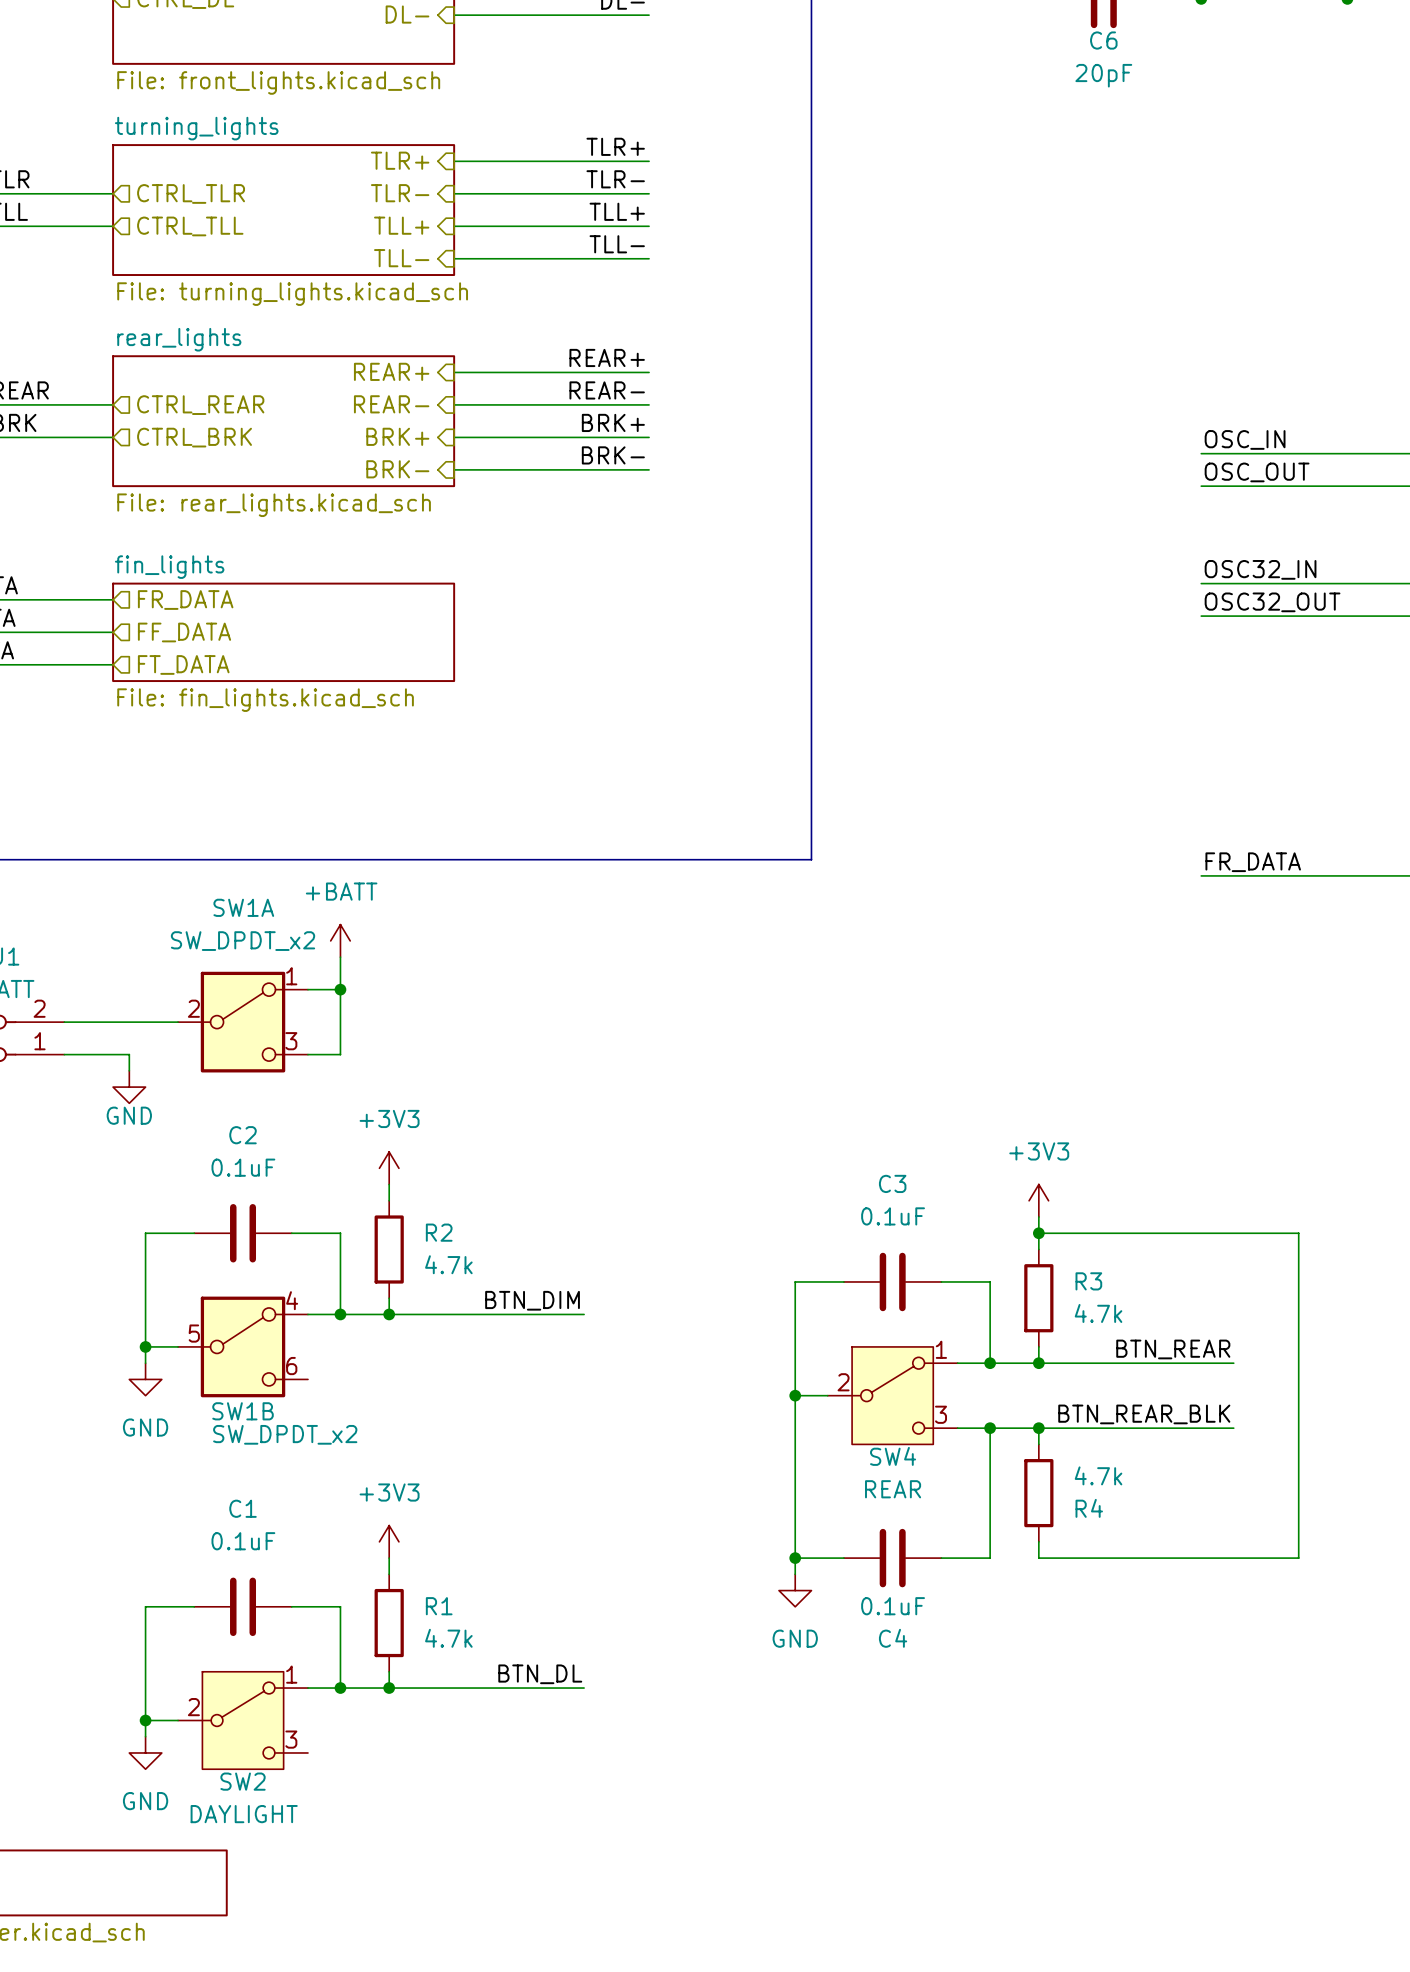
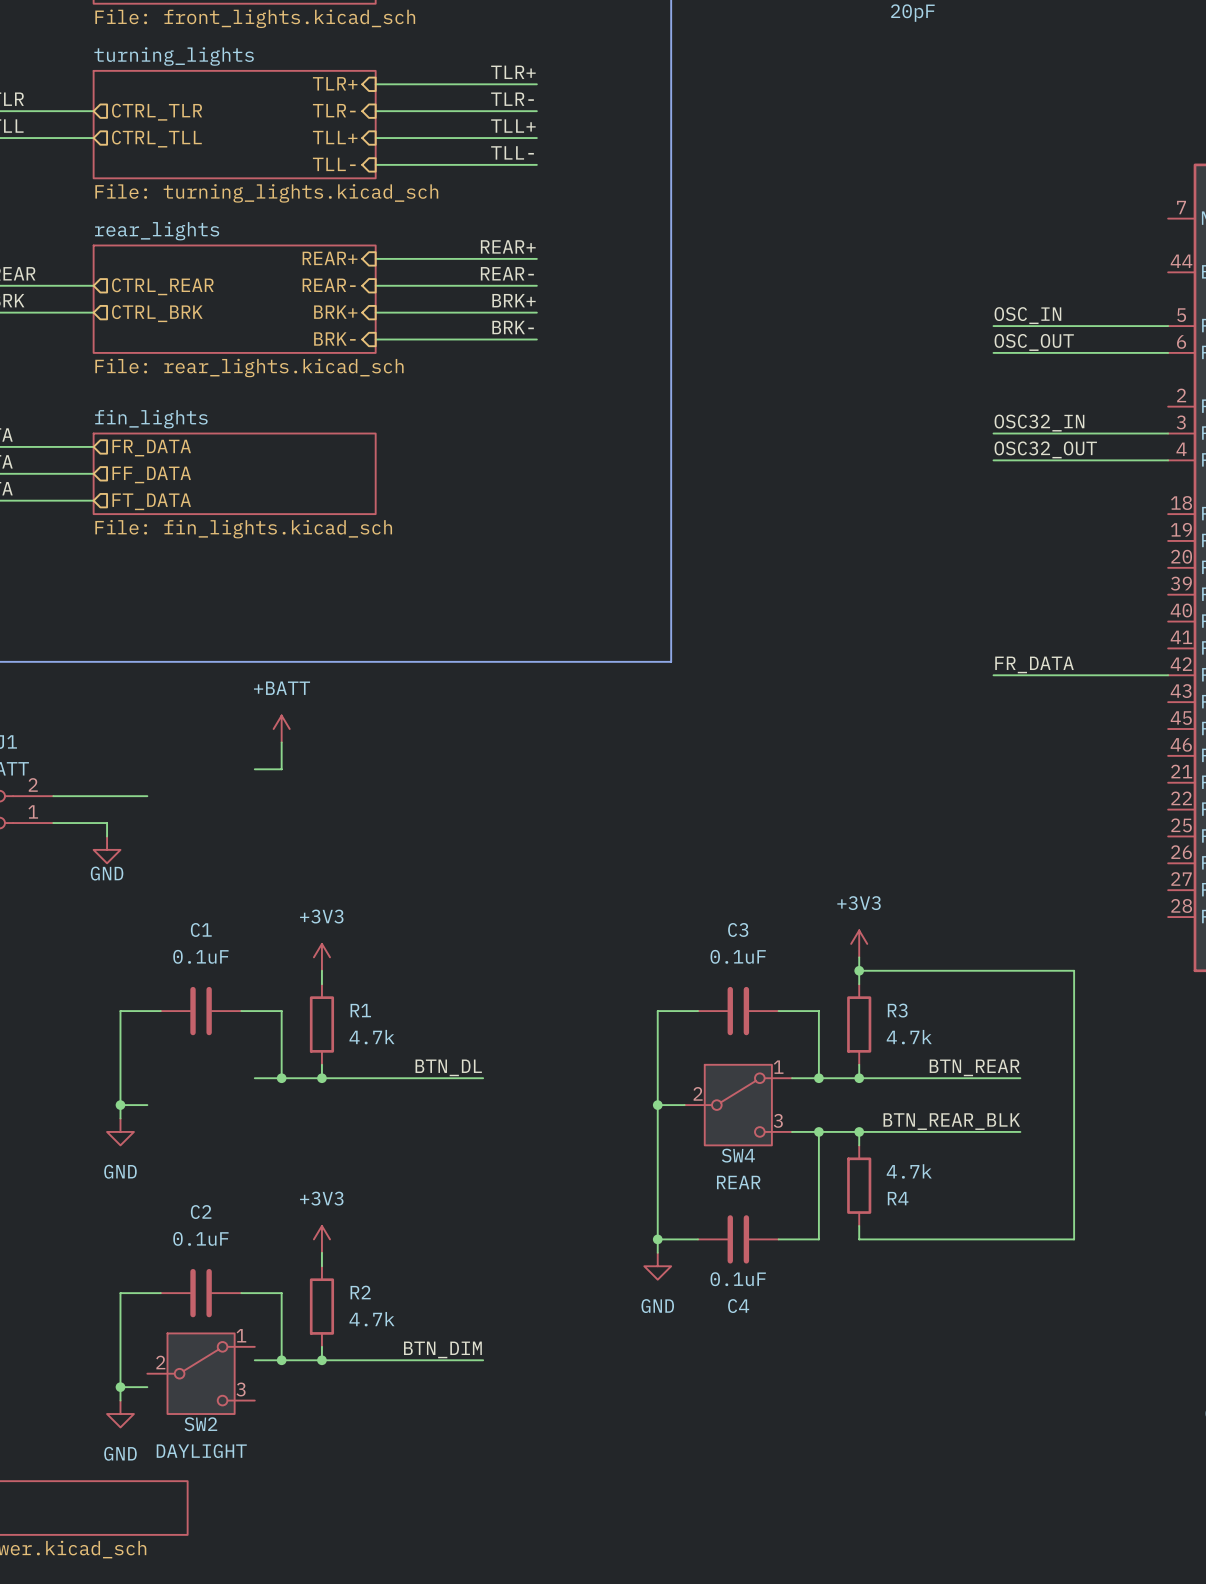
wire: (340, 989) (340, 1054) (307, 1054) -> none
junction: (340, 989) -> none
SW1A: SW_DPDT_x2 (243, 1022) -> none
power symbol position: +3V3 (389, 1168) -> +3V3 (321, 957)
wire: (389, 1184) (389, 1200) -> (321, 970) (321, 984)
wire: (194, 1233) (145, 1233) (145, 1281) -> (160, 1011) (120, 1011)
C2 position: (243, 1233) -> (201, 1293)
wire: (291, 1233) (340, 1233) (340, 1281) -> (241, 1011) (281, 1011)
R2 position: (389, 1249) -> (321, 1306)
wire: (389, 1298) (389, 1314) -> (321, 1064) (321, 1078)
label: BTN_DIM (532, 1300) -> none
wire: (307, 1314) (584, 1314) -> (254, 1078) (483, 1078)
wire: none -> (281, 1037) (281, 1078)
junction: (340, 1314) -> none
junction: (389, 1314) -> none
wire: (145, 1346) (178, 1346) -> (120, 1105) (147, 1105)
junction position: (145, 1346) -> (120, 1105)
SW1B: SW_DPDT_x2 (243, 1346) -> none
label: none -> BTN_DL (448, 1067)
wire: none -> (120, 1078) (120, 1118)
junction: none -> (281, 1078)
junction: none -> (321, 1078)
power symbol position: GND (145, 1379) -> GND (120, 1131)
power symbol position: +3V3 (389, 1541) -> +3V3 (321, 1239)
wire: (194, 1606) (145, 1606) (145, 1623) -> (160, 1293) (120, 1293)
C1 position: (243, 1606) -> (201, 1011)
wire: (291, 1606) (340, 1606) (340, 1623) -> (241, 1293) (281, 1293)
R1 position: (389, 1623) -> (321, 1024)
label: BTN_DL (540, 1674) -> BTN_DIM (442, 1349)
wire: (307, 1688) (584, 1688) -> (254, 1360) (483, 1360)
wire: none -> (281, 1346) (281, 1360)
junction position: (340, 1688) -> (281, 1360)
junction position: (389, 1688) -> (321, 1360)
wire: (145, 1720) (178, 1720) -> none
junction position: (145, 1720) -> (120, 1387)
wire: none -> (147, 1387) (120, 1387) (120, 1400)
power symbol position: GND (145, 1752) -> GND (120, 1414)

